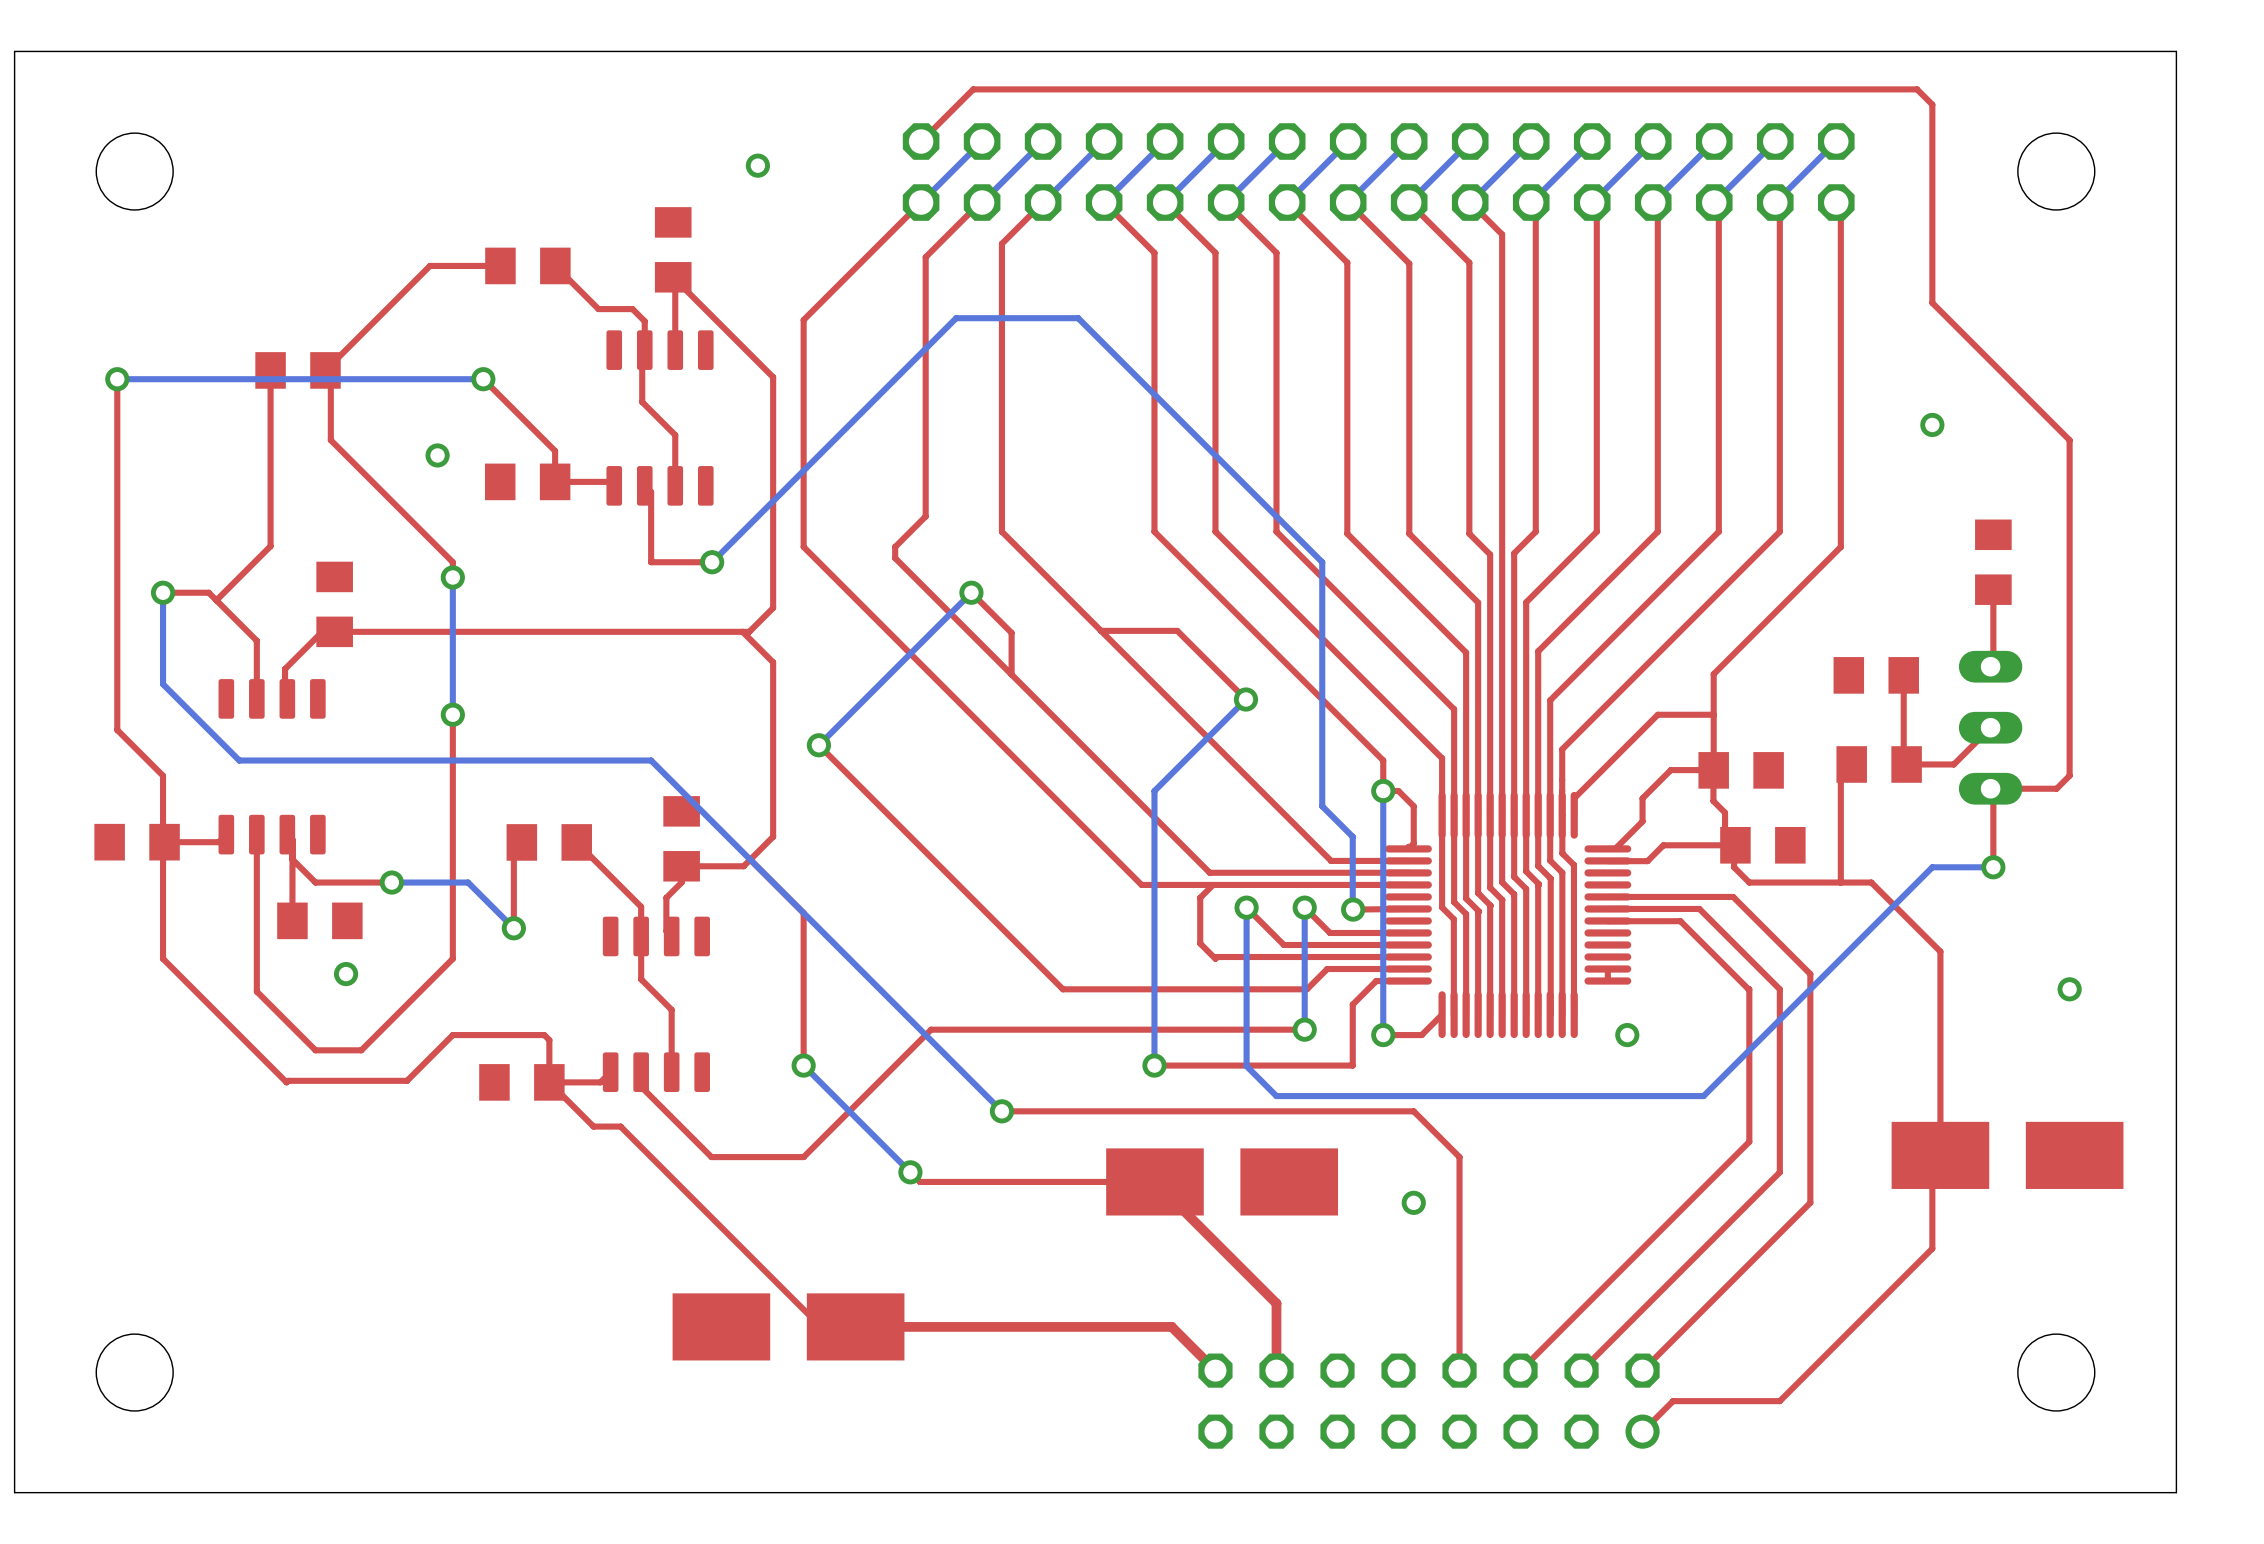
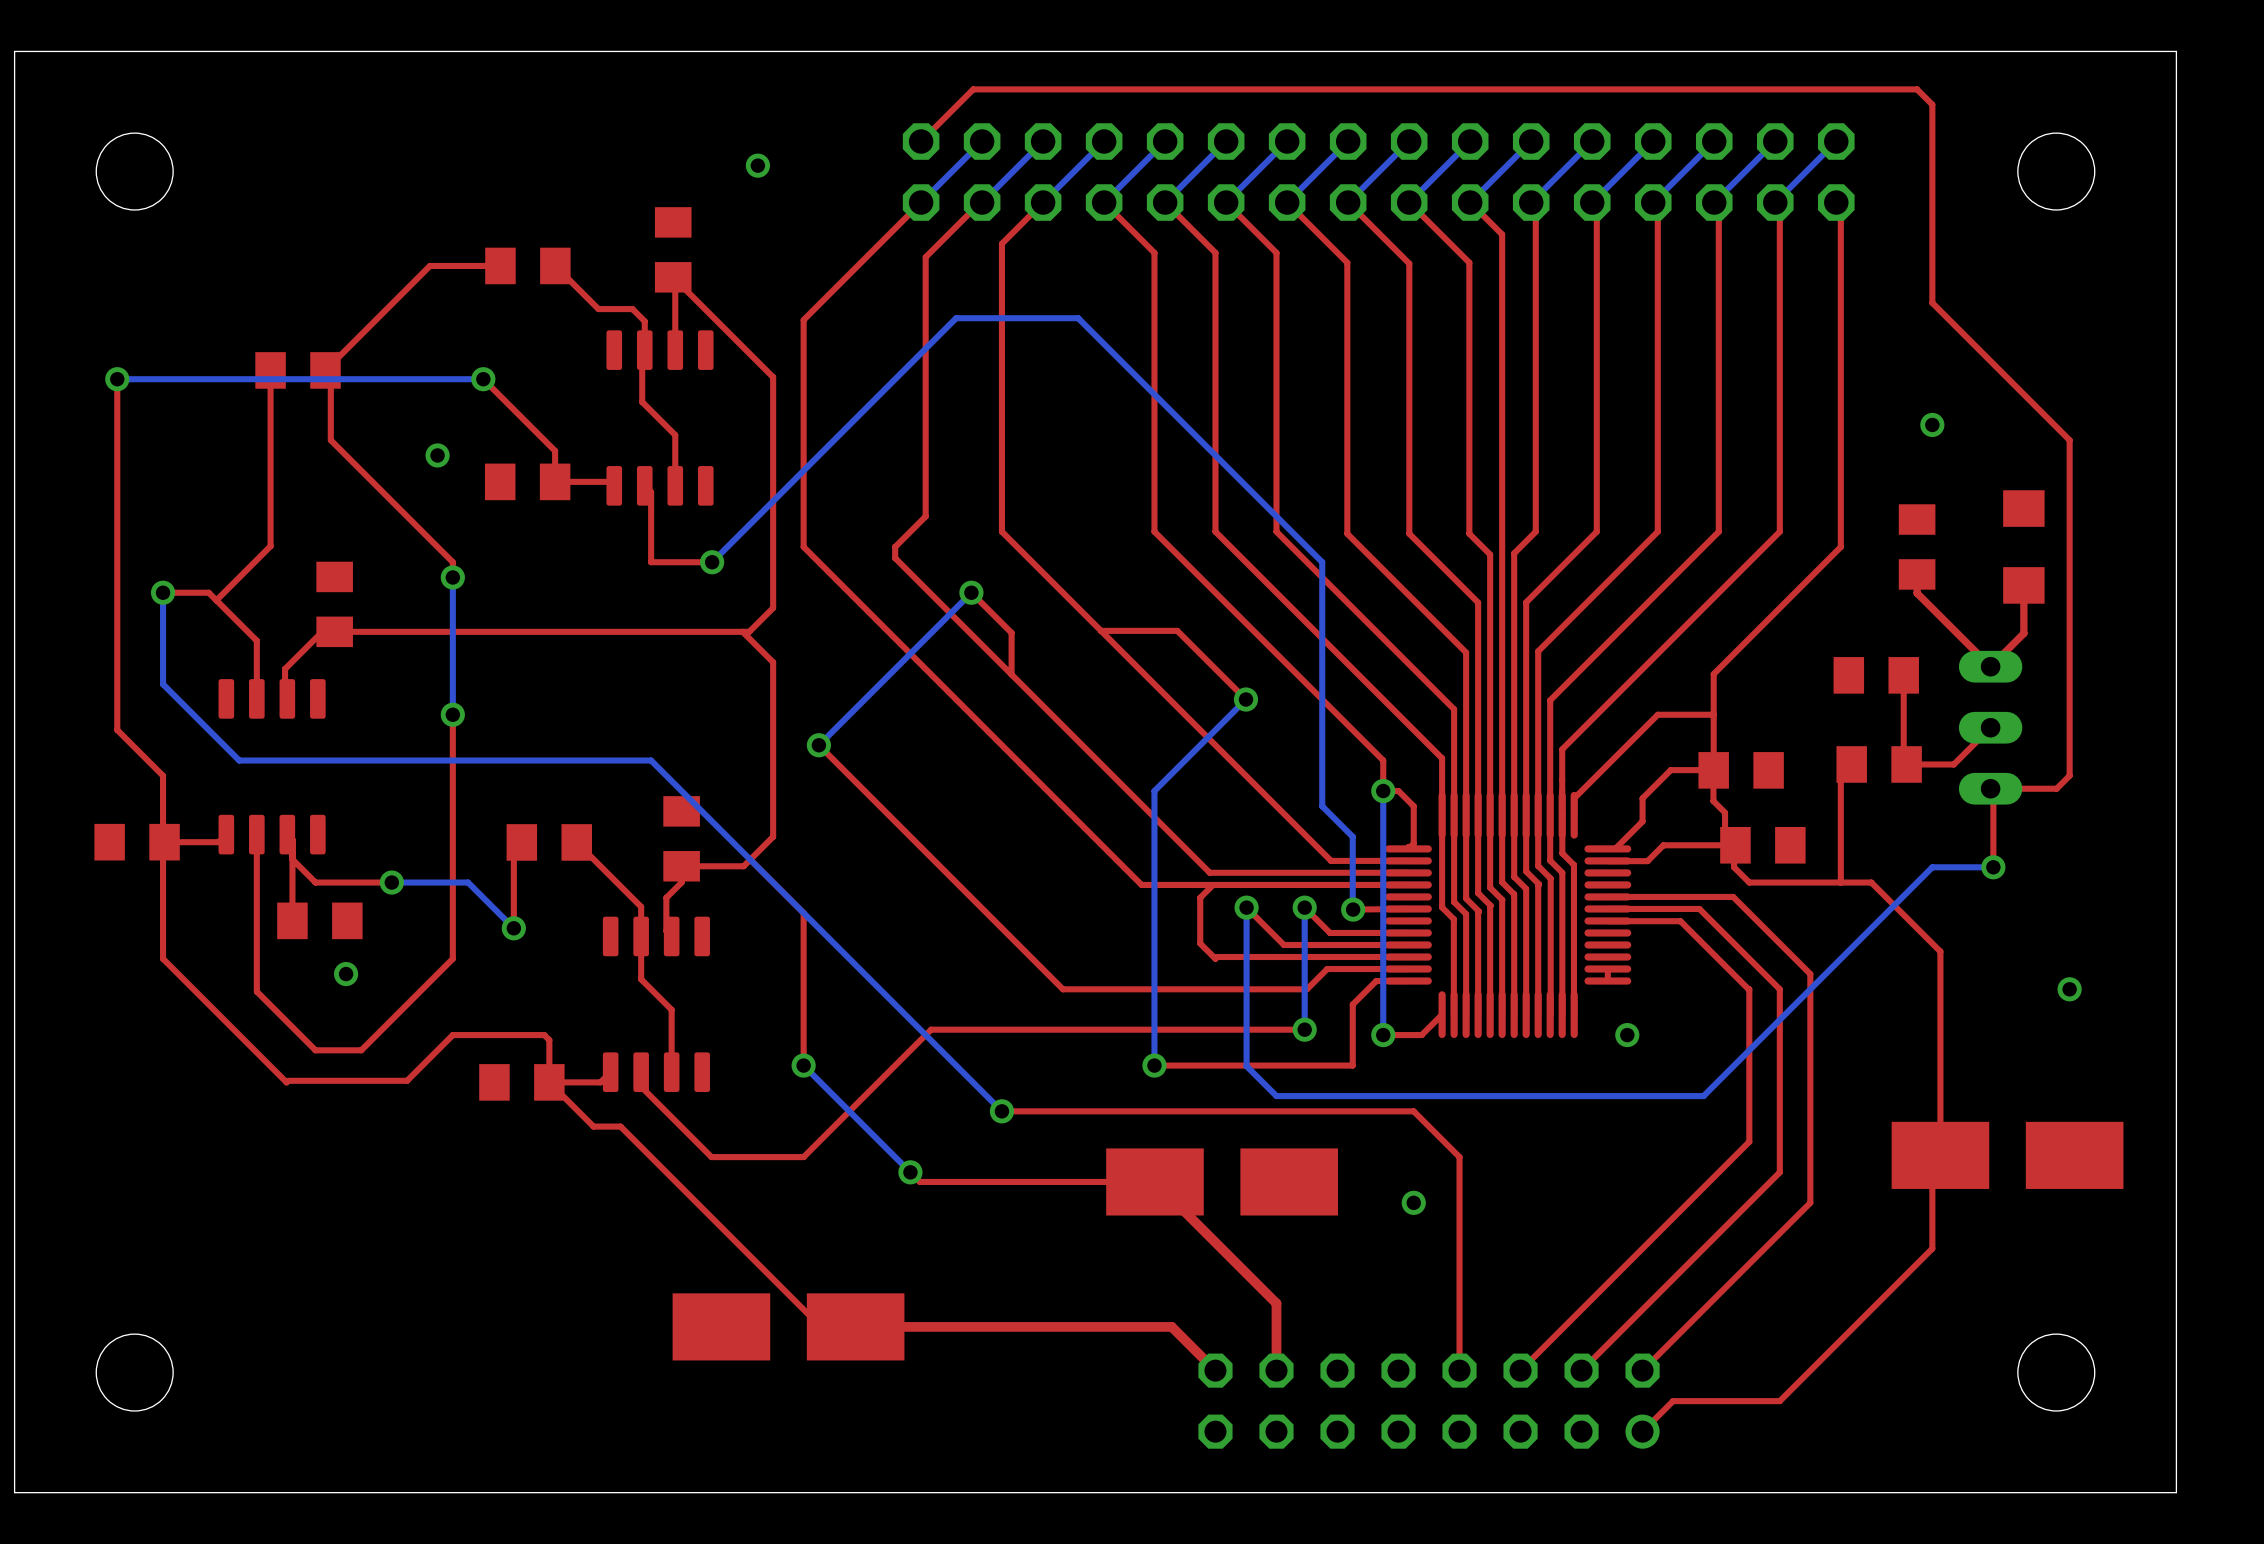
part: none -> (2023, 546)
part position: (1993, 562) -> (1917, 546)
top track: none -> (1917, 574) (1917, 593) (1990, 666)
top track: (1993, 589) (1993, 661) (1995, 661) -> (2023, 585) (2023, 633) (1995, 661)

